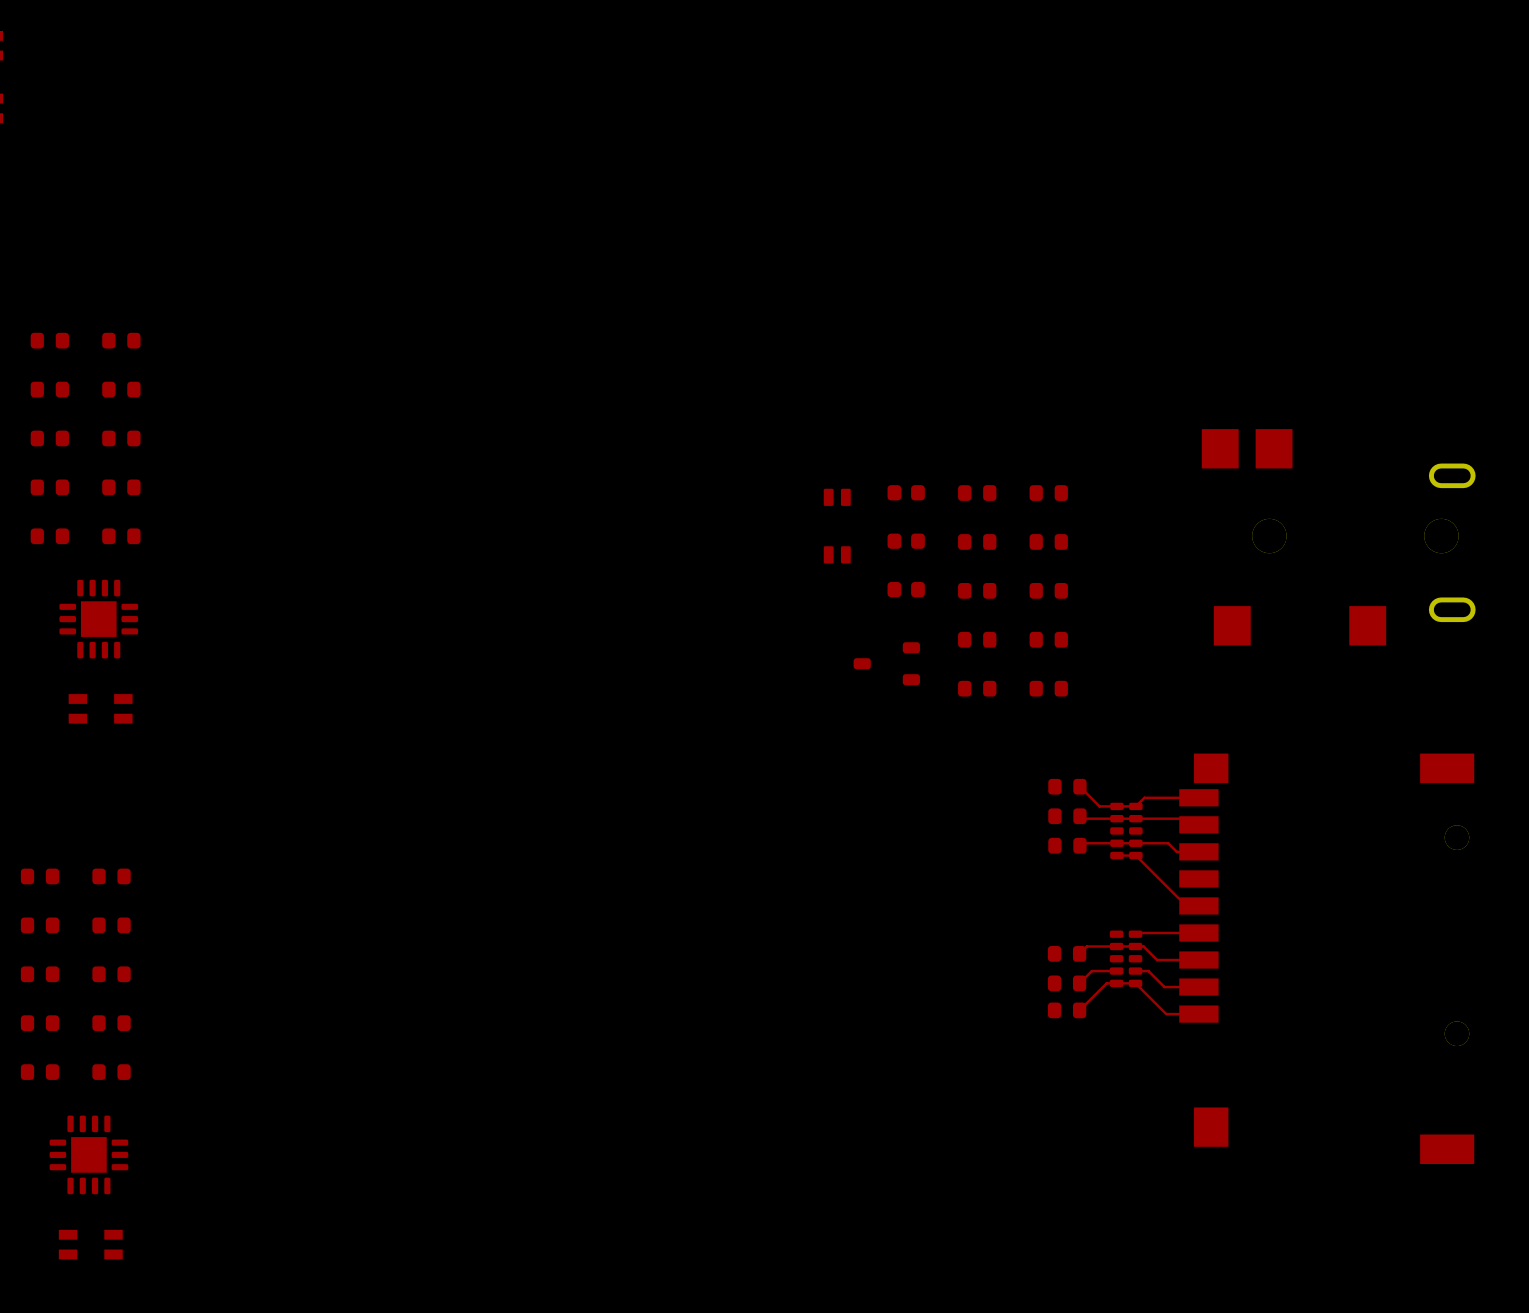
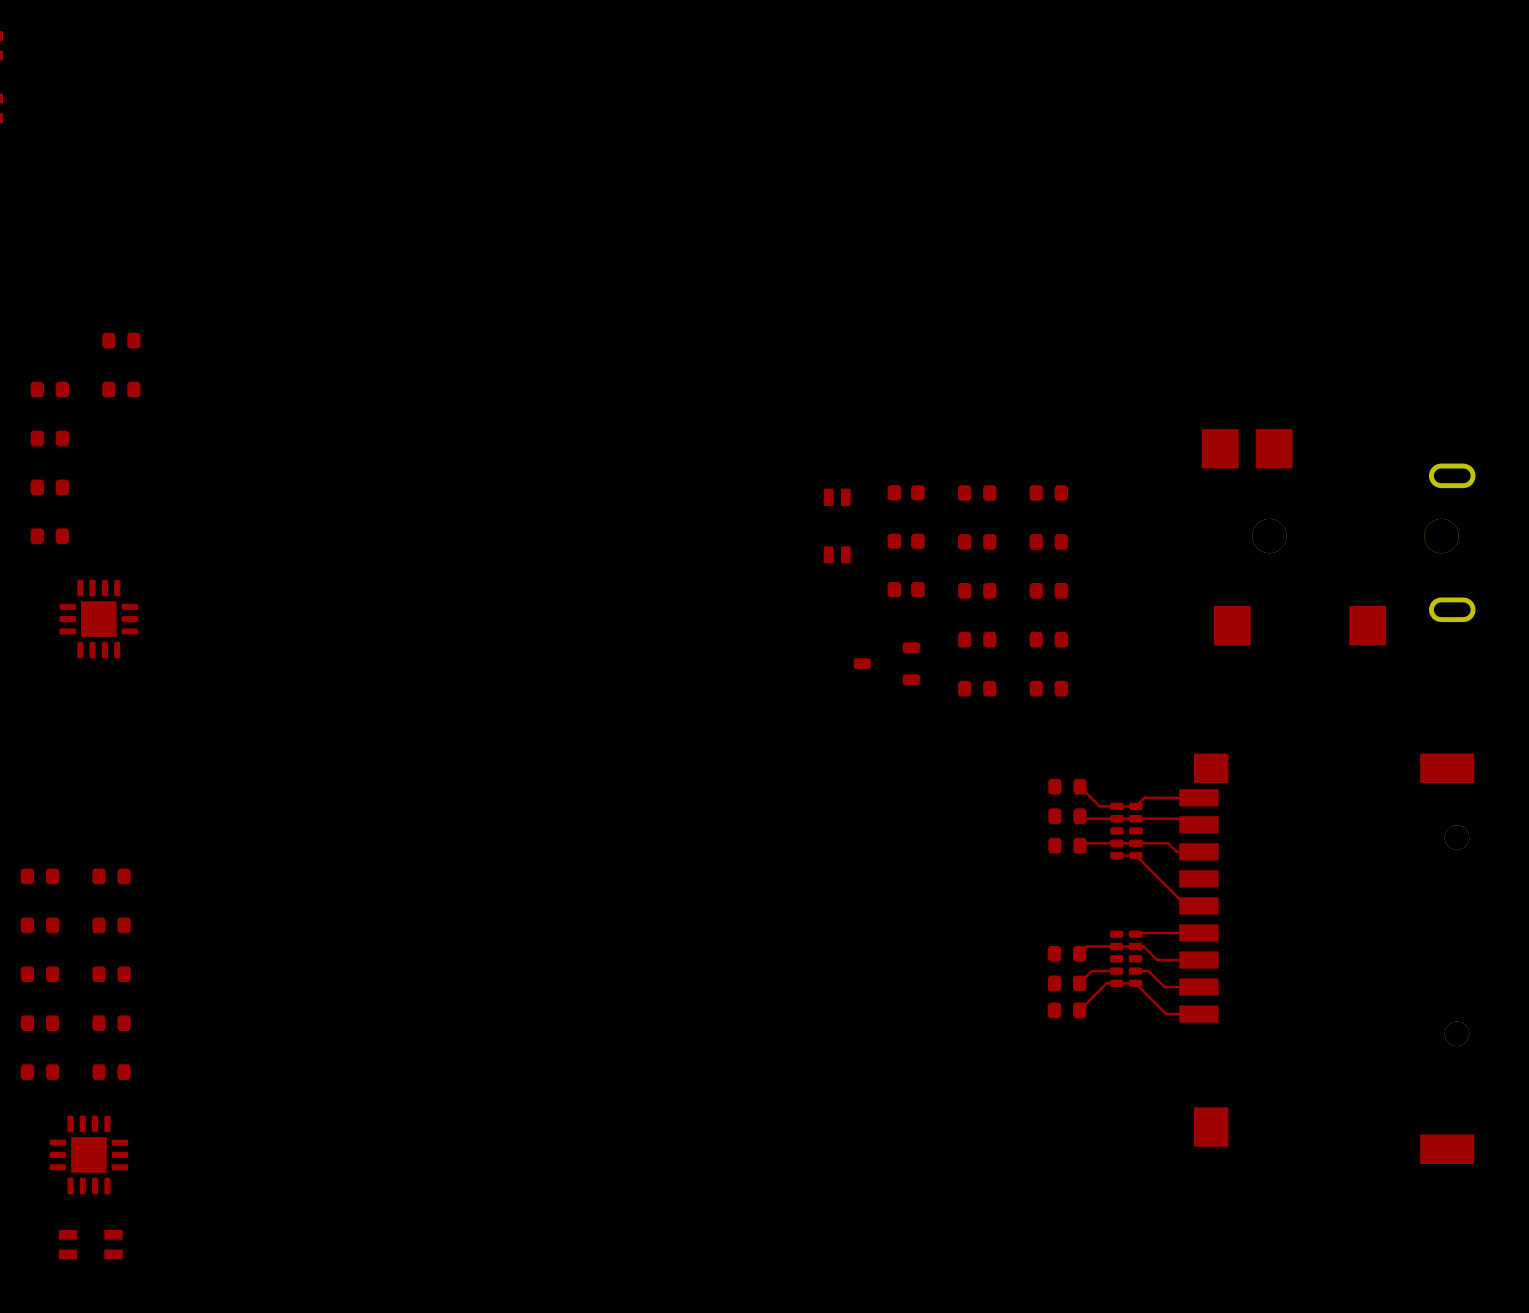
part: (49, 340) -> none
part: (121, 438) -> none
part: (121, 487) -> none
part: (121, 536) -> none
part: (100, 708) -> none

